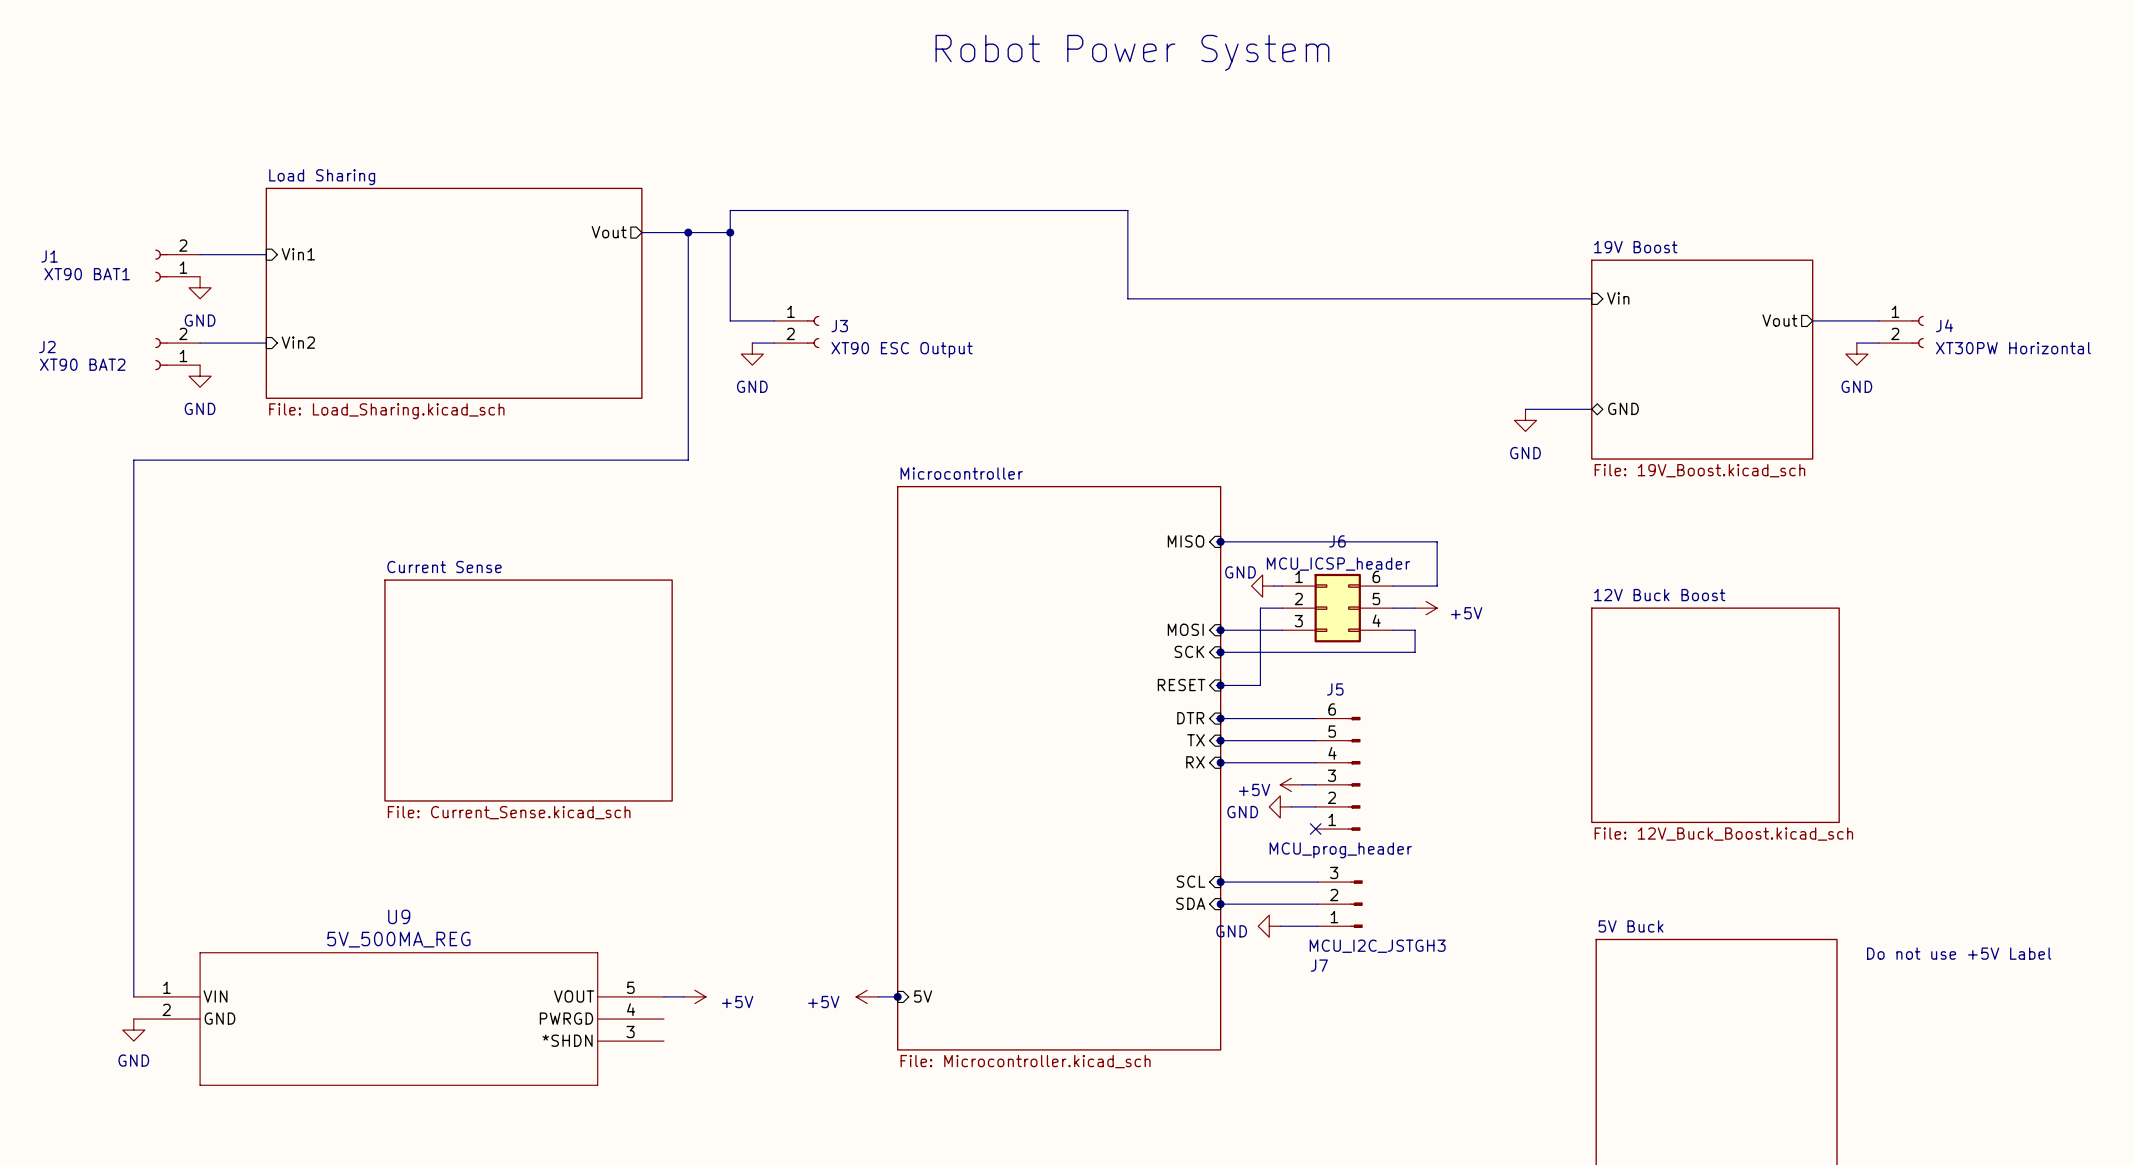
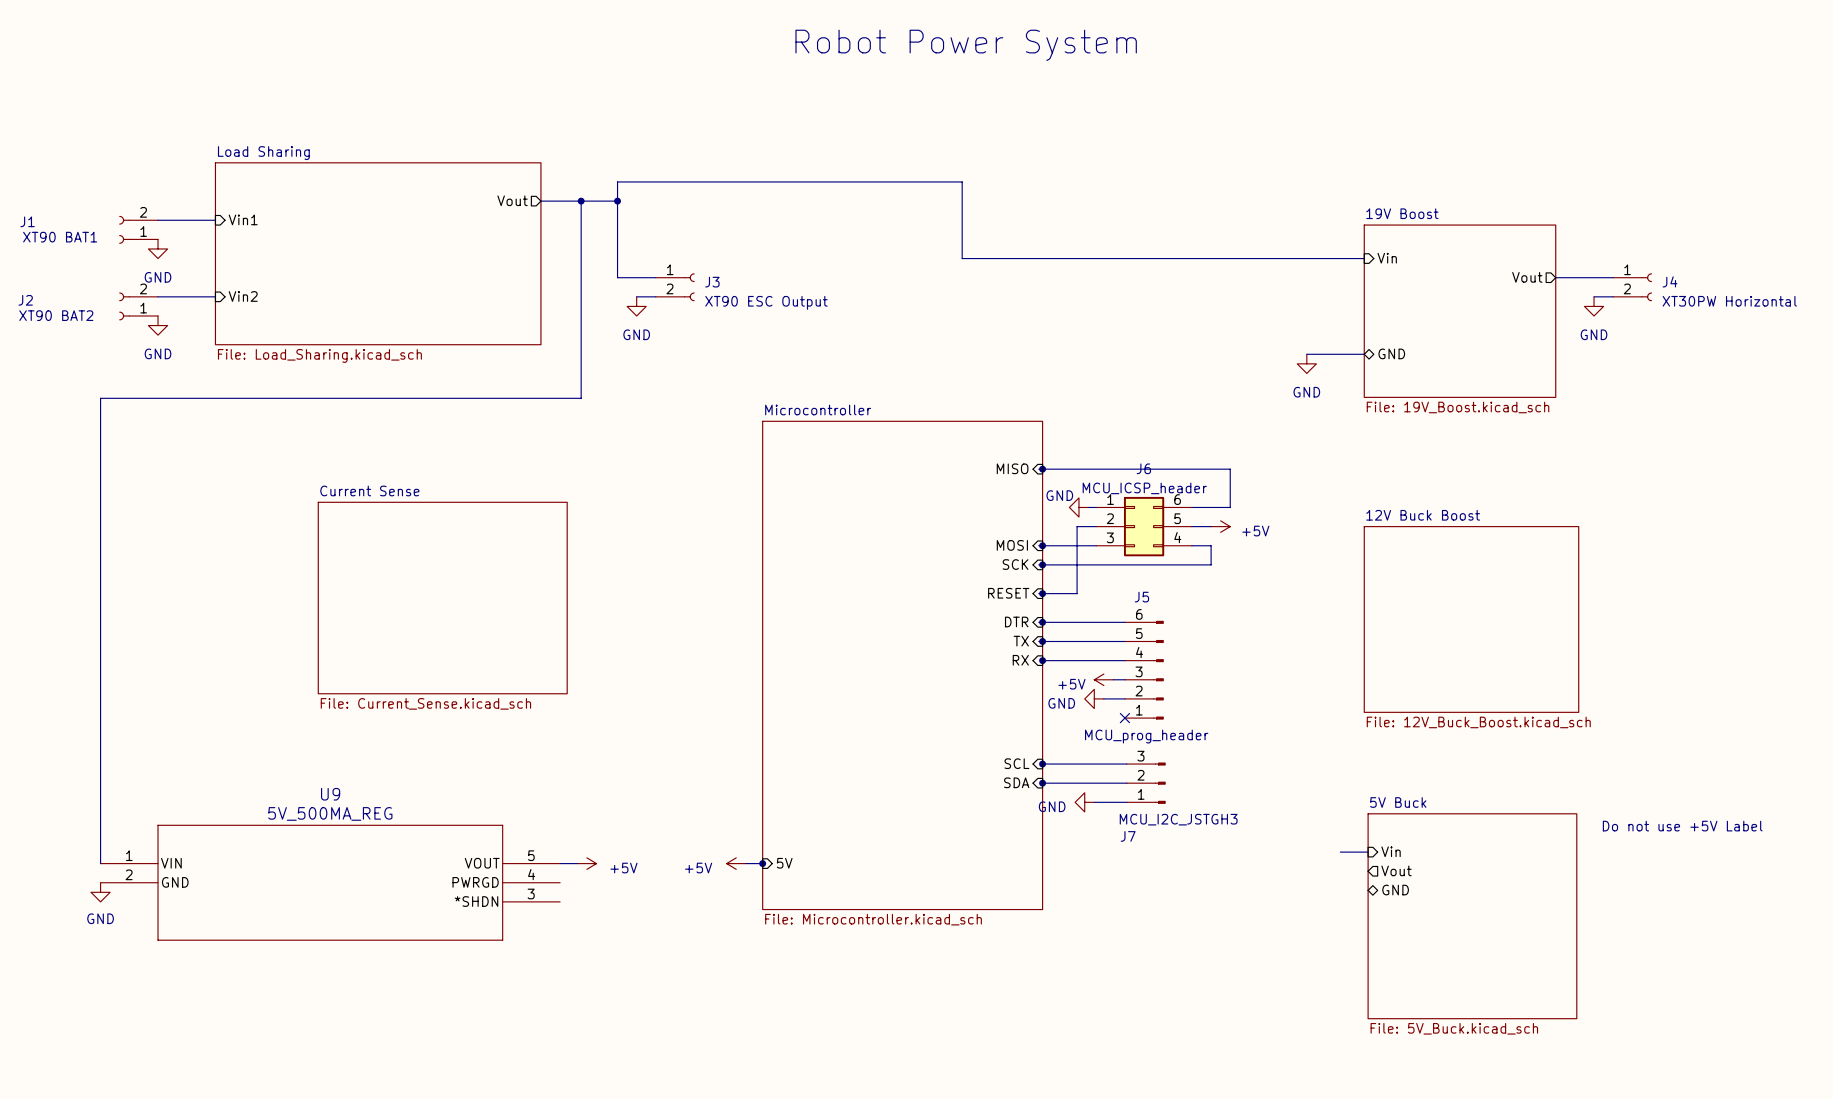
wire: none -> (1340, 852) (1368, 852)
sheet pin: none -> Vin (1391, 851)
sheet pin: none -> Vout (1396, 870)
sheet pin: none -> GND (1395, 890)

